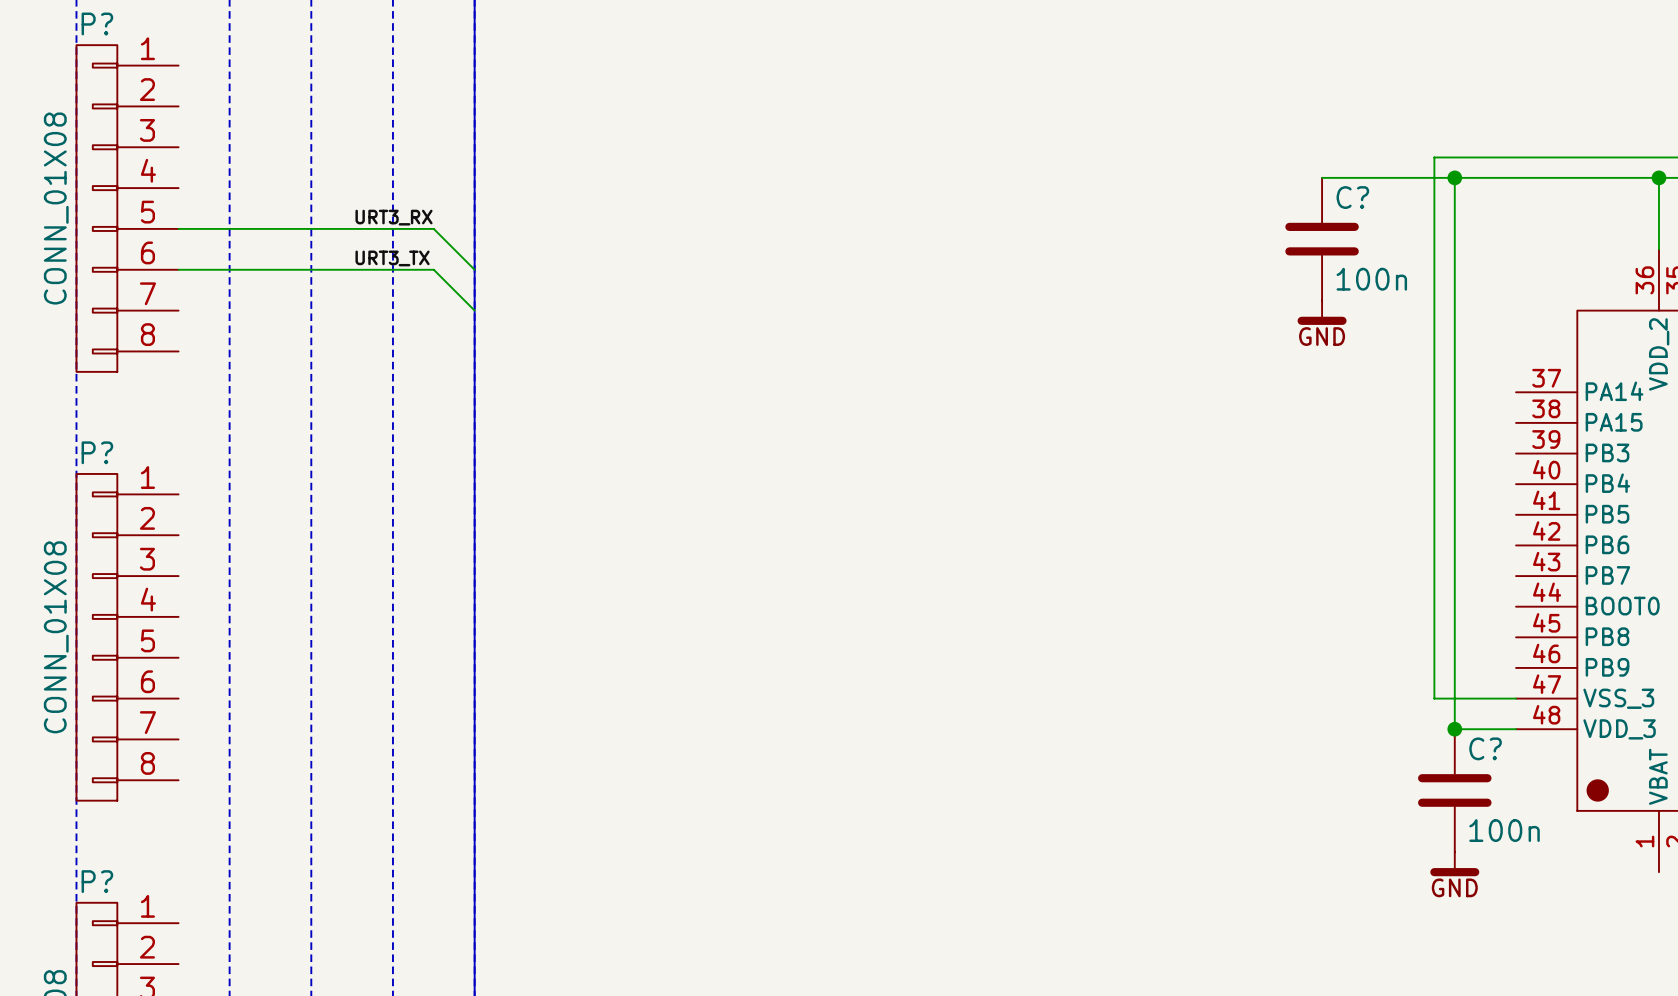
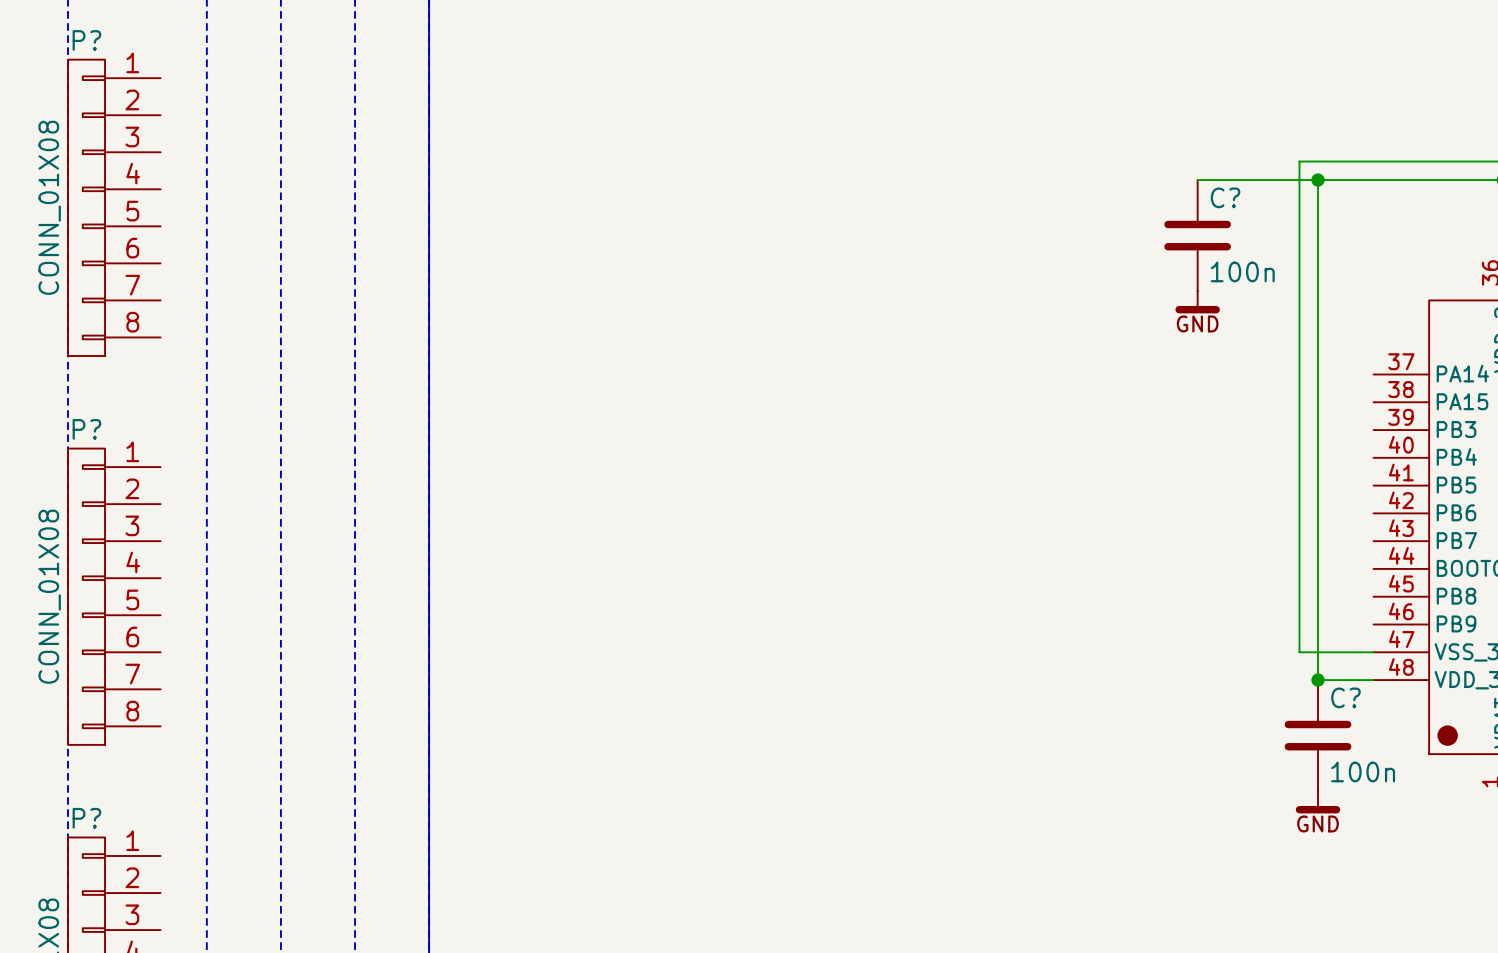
label: URT3_RX (394, 217) -> none
wire: (178, 228) (433, 228) (474, 269) -> none
label: URT3_TX (392, 258) -> none
wire: (178, 269) (433, 269) (474, 310) -> none

